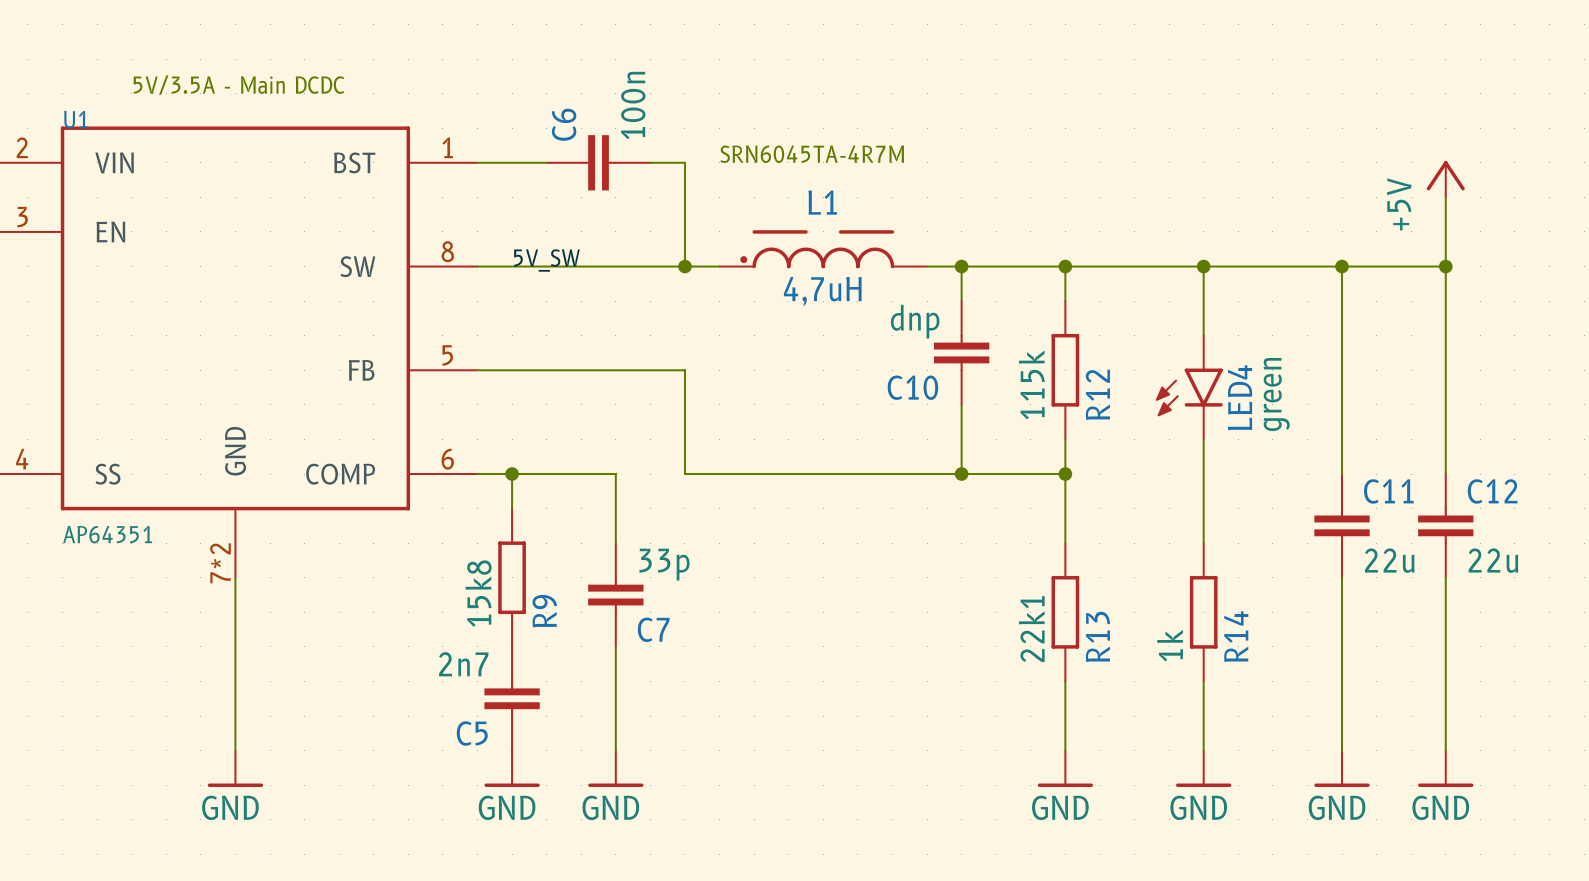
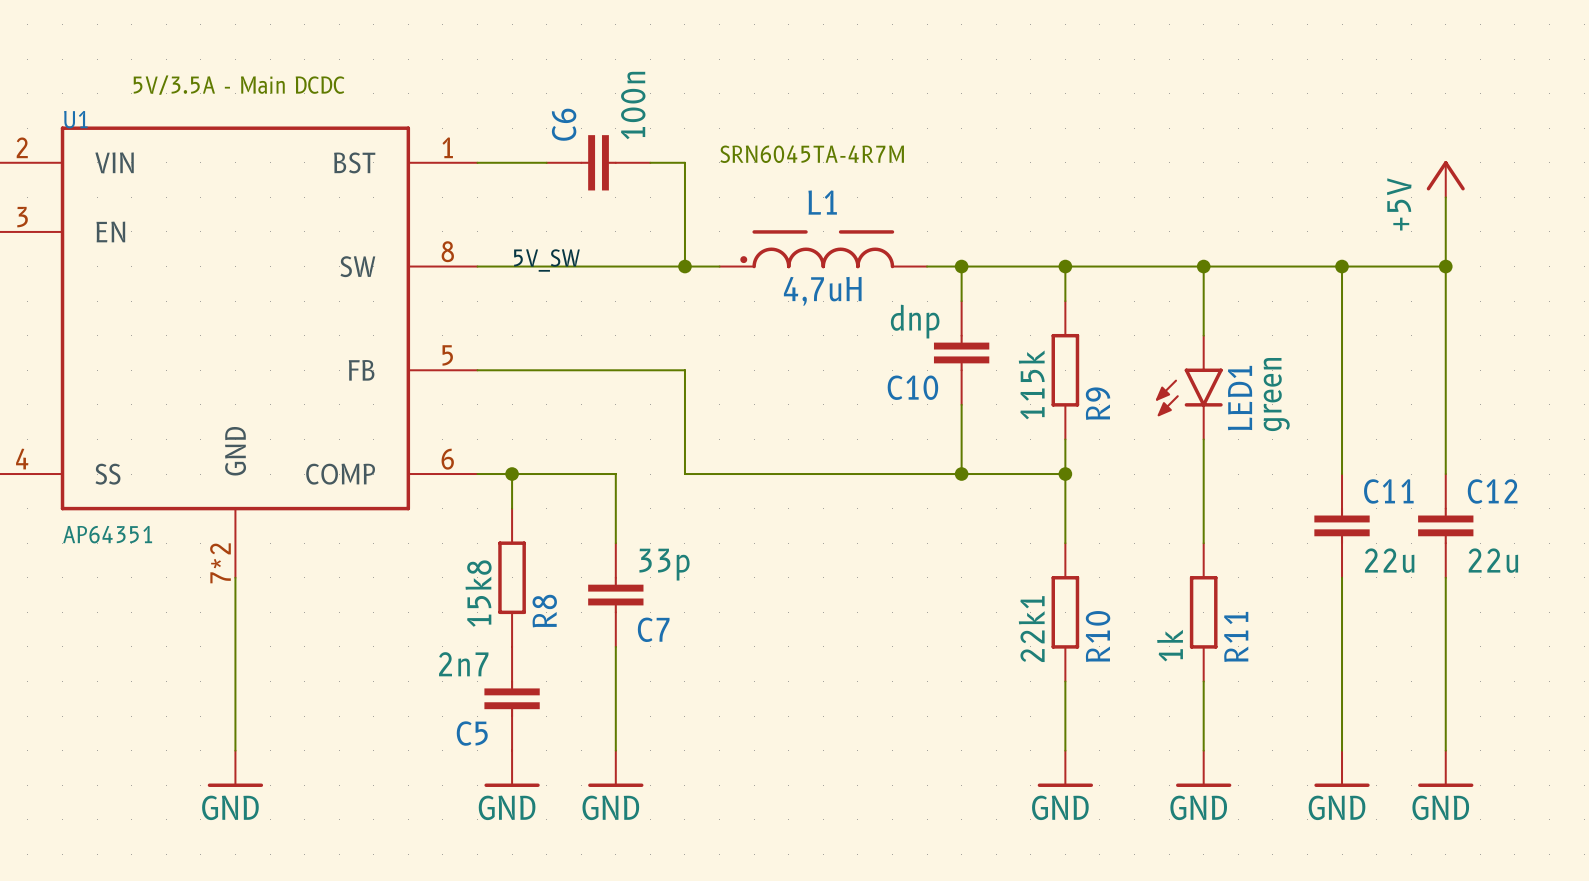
R12 name: R12 (1097, 394) -> R9 (1098, 403)
LED4 name: LED4 (1240, 397) -> LED1 (1240, 398)
R9 name: R9 (544, 611) -> R8 (544, 611)
R13 name: R13 (1097, 636) -> R10 (1098, 636)
R14 name: R14 (1236, 636) -> R11 (1236, 636)

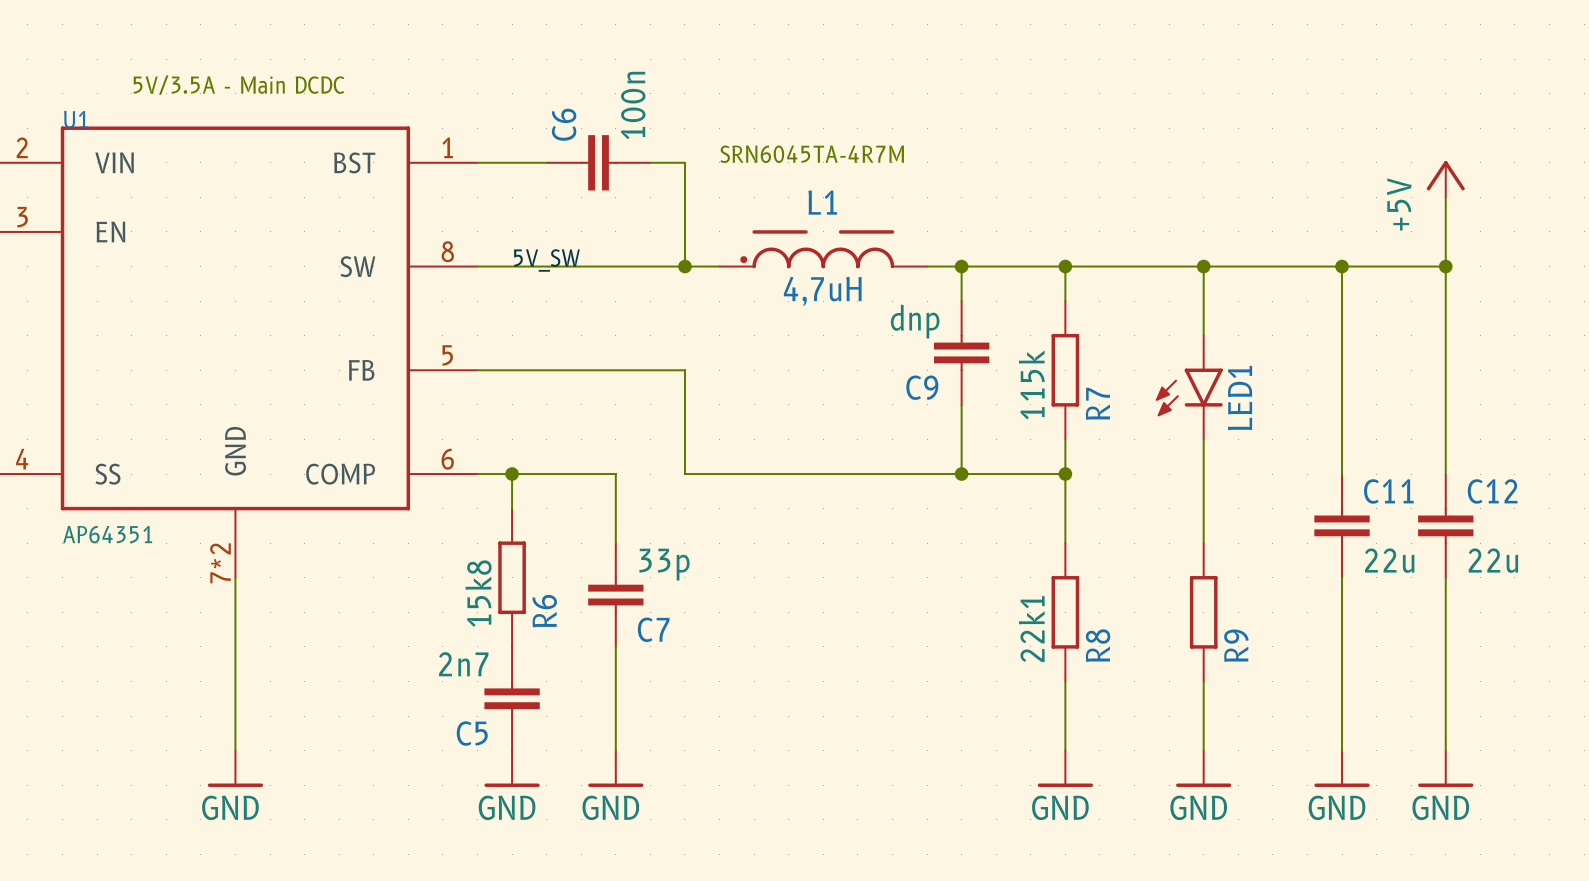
C10 name: C10 (912, 387) -> C9 (922, 387)
LED1 value: green (1276, 394) -> none
R9 name: R9 (1098, 403) -> R7 (1097, 403)
R8 name: R8 (544, 611) -> R6 (544, 611)
R10 name: R10 (1098, 636) -> R8 (1098, 645)
R11 name: R11 (1236, 636) -> R9 (1236, 645)
R11 value: 1k (1170, 645) -> none

